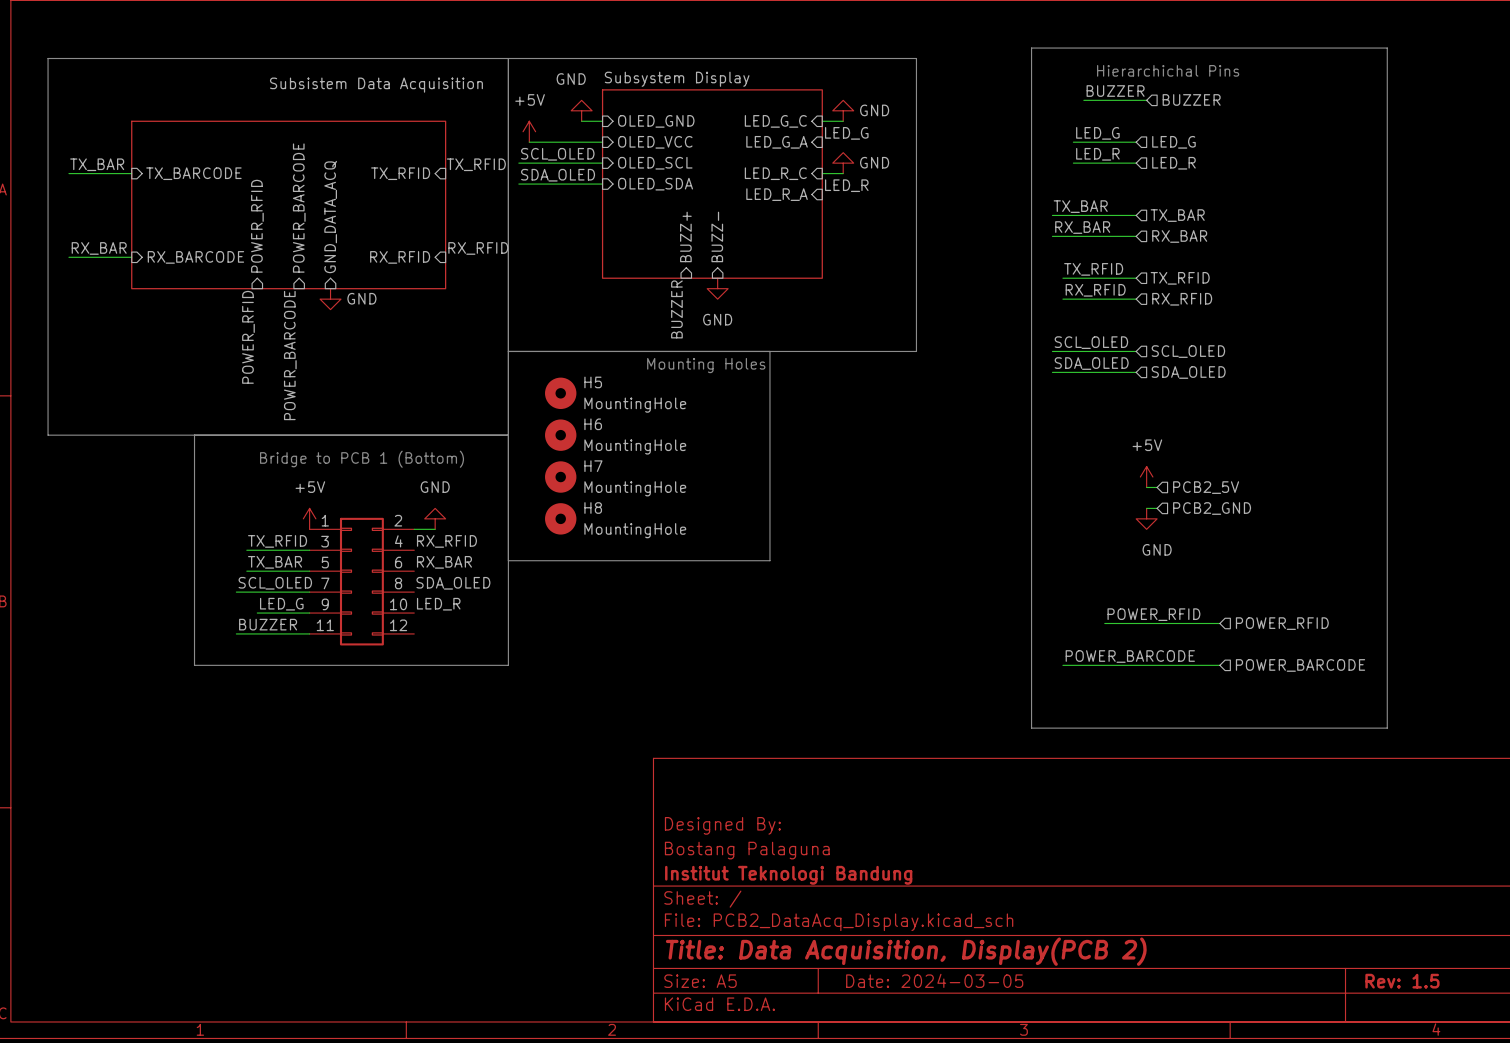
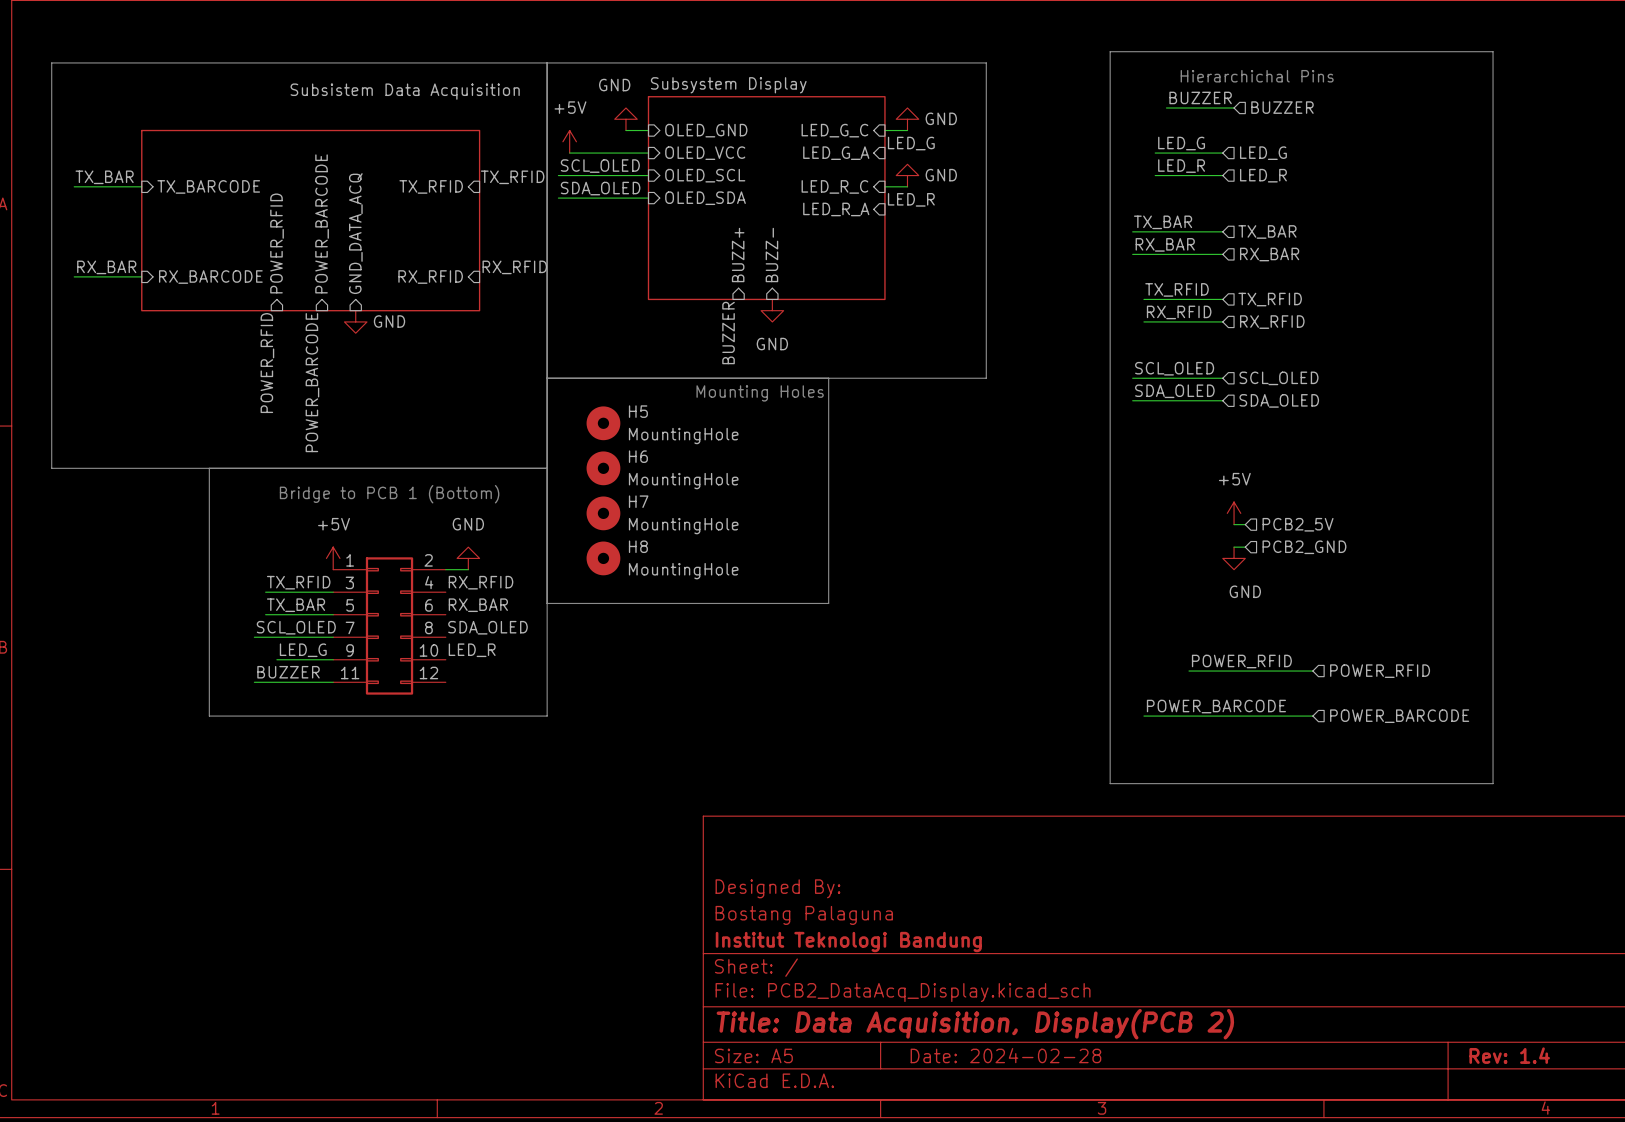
title block: Date: 2024-03-05 (934, 980) -> Date: 2024-02-28 (1005, 1055)
title block: Rev: 1.5 (1402, 981) -> Rev: 1.4 (1509, 1055)

